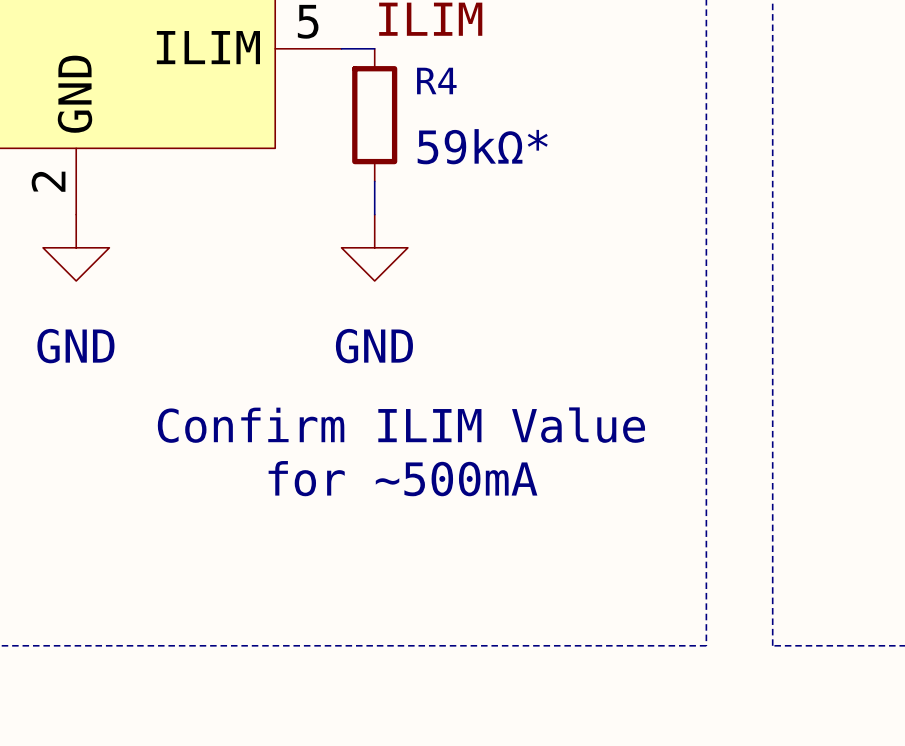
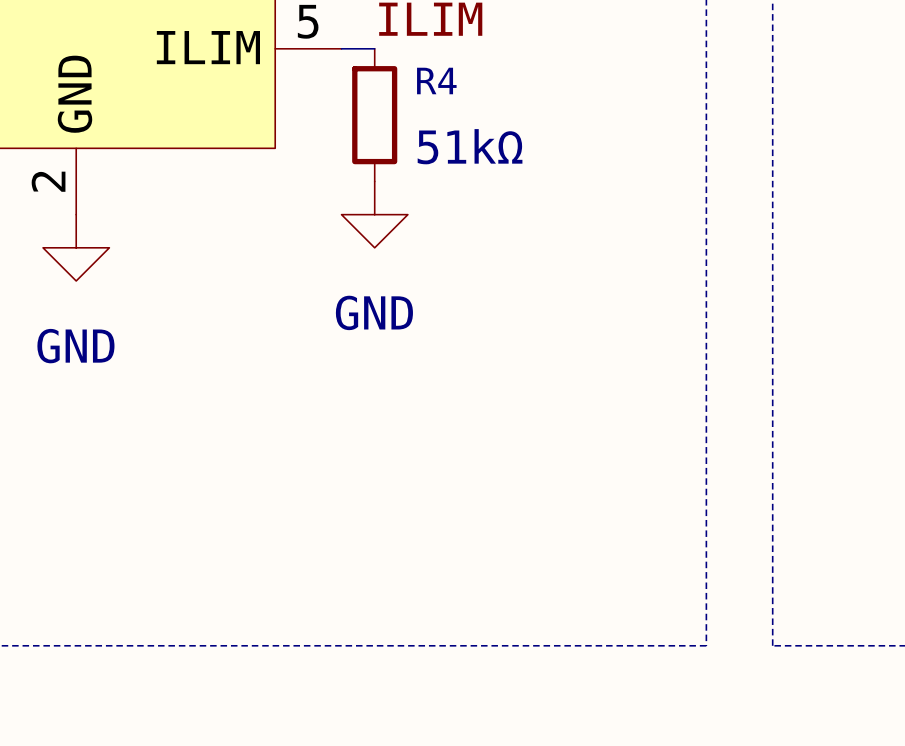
R4 value: 59kΩ* (482, 146) -> 51kΩ (470, 146)
power symbol position: GND (374, 247) -> GND (374, 214)
text: Confirm ILIM Value (401, 425) -> none
text: for ~500mA (402, 478) -> none

